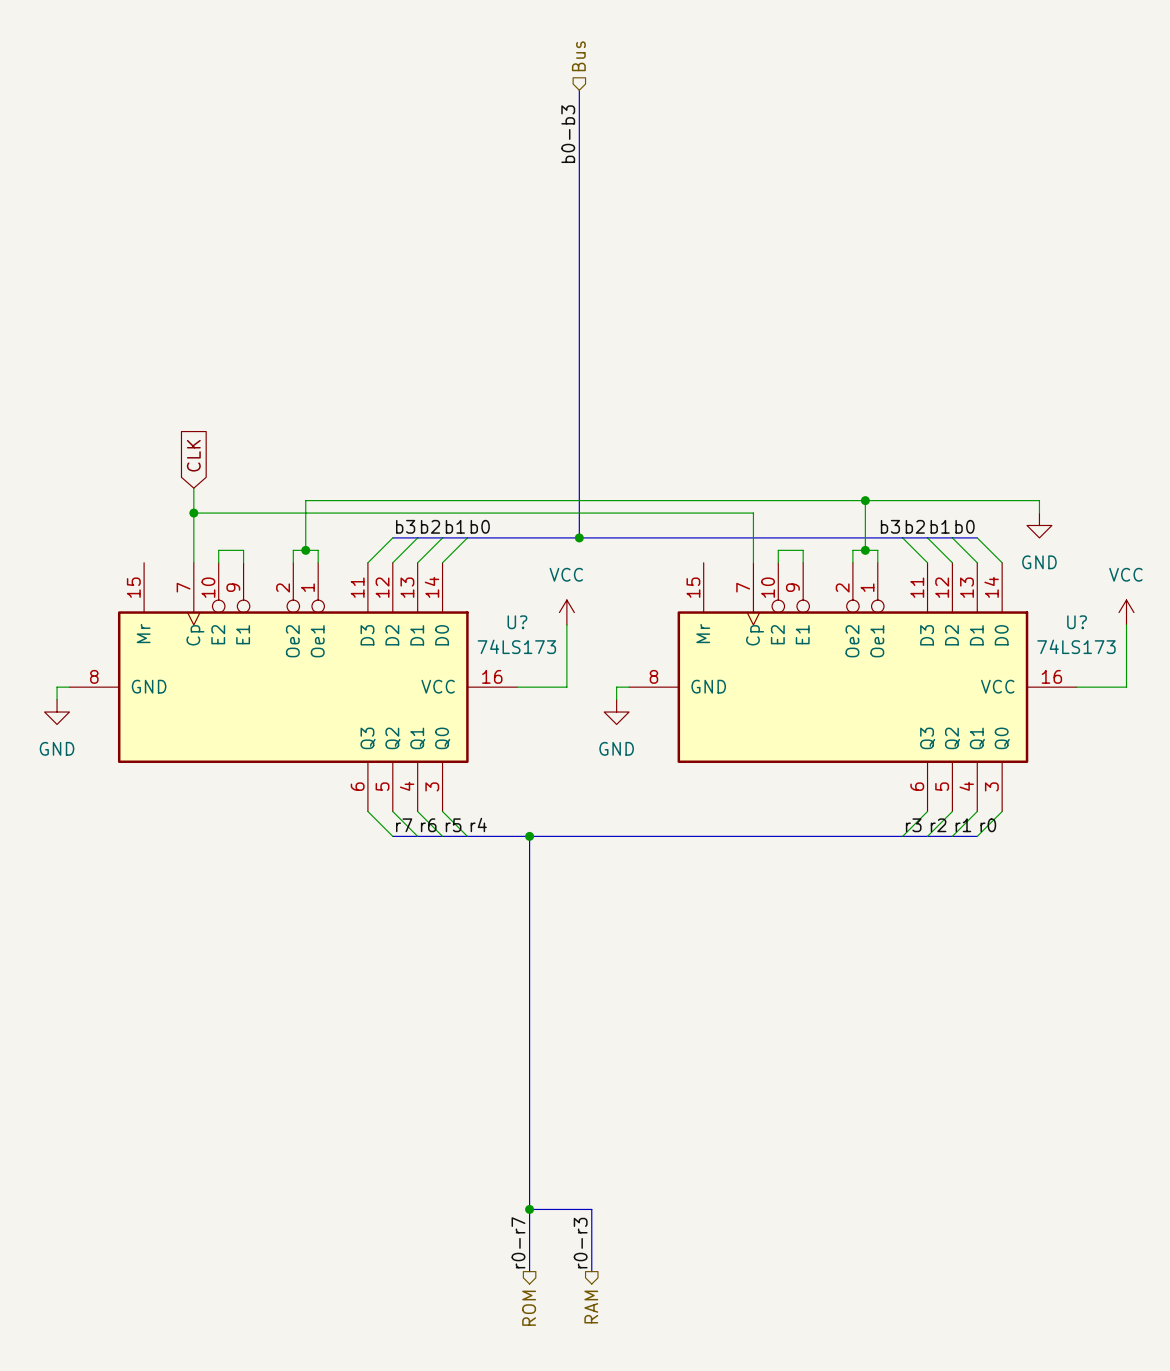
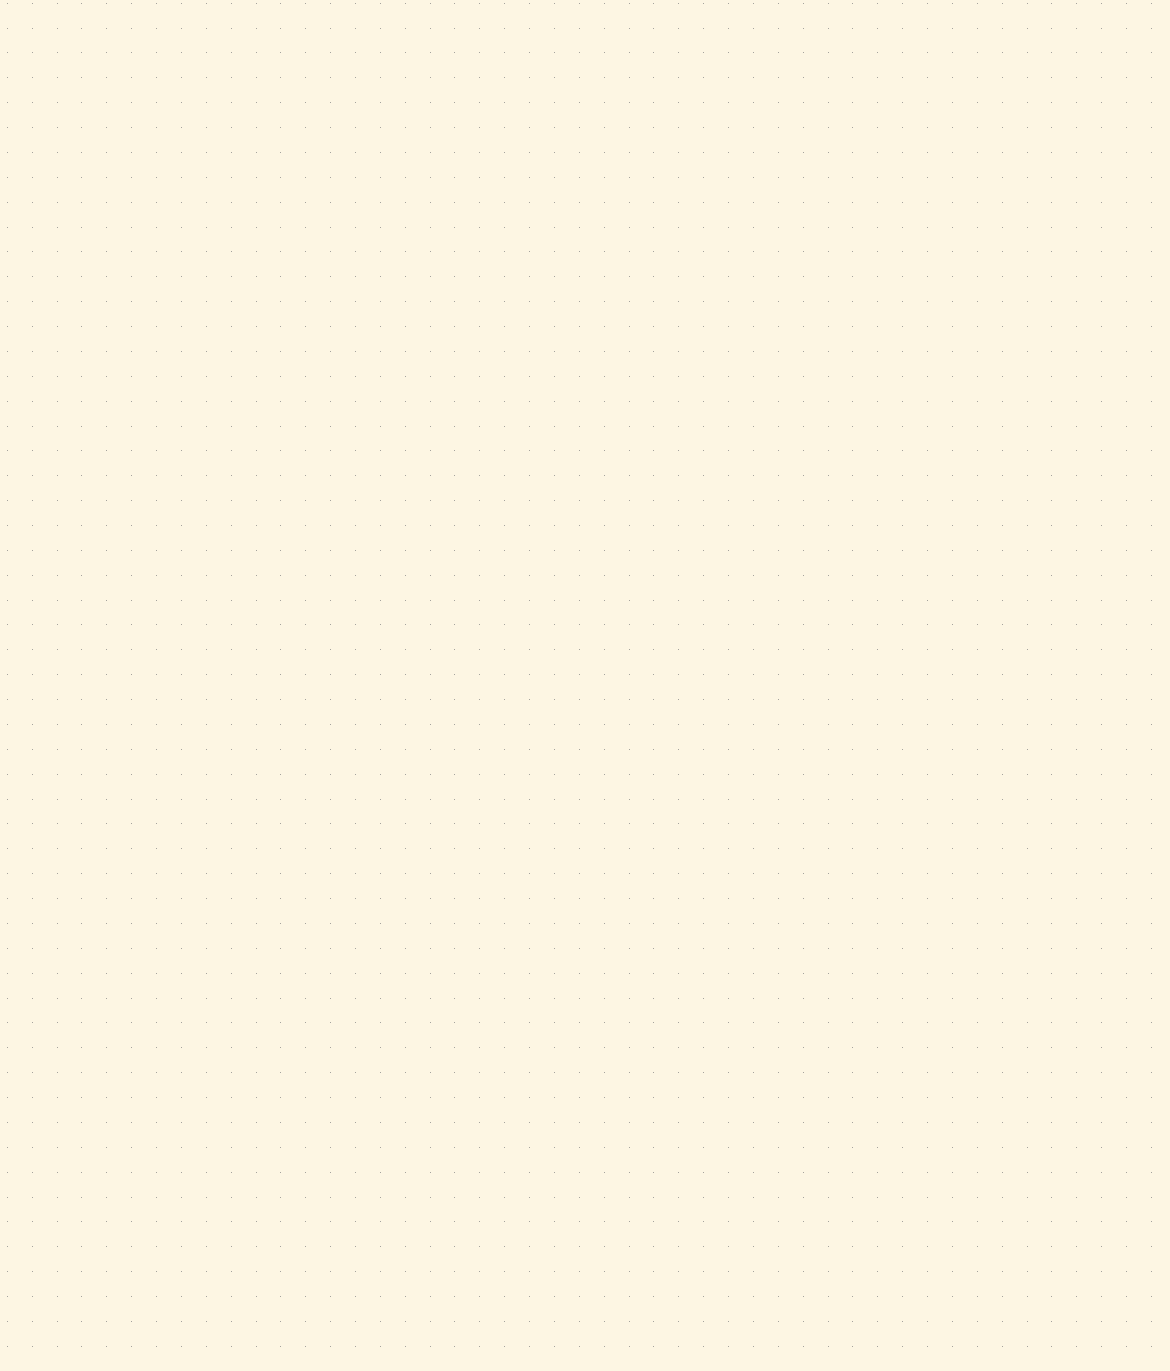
hierarchical label: Bus (578, 56) -> none
bus: (579, 90) (579, 537) -> none
label: b0-b3 (568, 134) -> none
global label: CLK (193, 455) -> none
wire: (193, 488) (193, 562) -> none
wire: (865, 500) (865, 550) -> none
junction: (865, 500) -> none
wire: (193, 513) (753, 513) (753, 562) -> none
junction: (193, 513) -> none
wire: (1039, 513) (1039, 500) (305, 500) (305, 550) -> none
power symbol: GND (1039, 525) -> none
label: b3 (405, 526) -> none
label: b2 (430, 526) -> none
label: b1 (455, 526) -> none
label: b0 (480, 526) -> none
label: b3 (890, 526) -> none
label: b2 (915, 526) -> none
label: b1 (940, 526) -> none
label: b0 (965, 526) -> none
wire: (392, 537) (367, 562) -> none
bus: (392, 537) (977, 537) -> none
wire: (417, 537) (392, 562) -> none
wire: (442, 537) (417, 562) -> none
wire: (467, 537) (442, 562) -> none
junction: (579, 537) -> none
wire: (902, 537) (927, 562) -> none
wire: (927, 537) (952, 562) -> none
wire: (952, 537) (977, 562) -> none
wire: (977, 537) (1002, 562) -> none
junction: (305, 550) -> none
junction: (865, 550) -> none
wire: (218, 562) (218, 550) (243, 550) (243, 562) -> none
wire: (293, 562) (293, 550) (318, 550) (318, 562) -> none
wire: (778, 562) (778, 550) (803, 550) (803, 562) -> none
wire: (852, 562) (852, 550) (877, 550) (877, 562) -> none
power symbol: VCC (566, 612) -> none
power symbol: VCC (1126, 612) -> none
wire: (566, 624) (566, 687) (517, 687) -> none
wire: (1126, 624) (1126, 687) (1076, 687) -> none
wire: (69, 687) (57, 687) (57, 699) -> none
U?: 74LS173 (293, 687) -> none
wire: (629, 687) (616, 687) (616, 699) -> none
U?: 74LS173 (852, 687) -> none
power symbol: GND (57, 712) -> none
power symbol: GND (616, 712) -> none
wire: (367, 811) (392, 836) -> none
wire: (392, 811) (417, 836) -> none
wire: (417, 811) (442, 836) -> none
wire: (442, 811) (467, 836) -> none
wire: (927, 811) (902, 836) -> none
wire: (952, 811) (927, 836) -> none
wire: (977, 811) (952, 836) -> none
wire: (1002, 811) (977, 836) -> none
label: r4 (478, 824) -> none
label: r7 (404, 825) -> none
label: r6 (428, 825) -> none
label: r5 (453, 825) -> none
label: r3 (913, 825) -> none
label: r2 (938, 825) -> none
label: r1 (963, 825) -> none
label: r0 (988, 825) -> none
bus: (392, 836) (977, 836) -> none
bus: (529, 836) (529, 1271) -> none
junction: (529, 836) -> none
bus: (529, 1209) (591, 1209) (591, 1271) -> none
junction: (529, 1209) -> none
label: r0-r7 (518, 1242) -> none
label: r0-r3 (580, 1243) -> none
hierarchical label: RAM (591, 1307) -> none
hierarchical label: ROM (529, 1308) -> none

